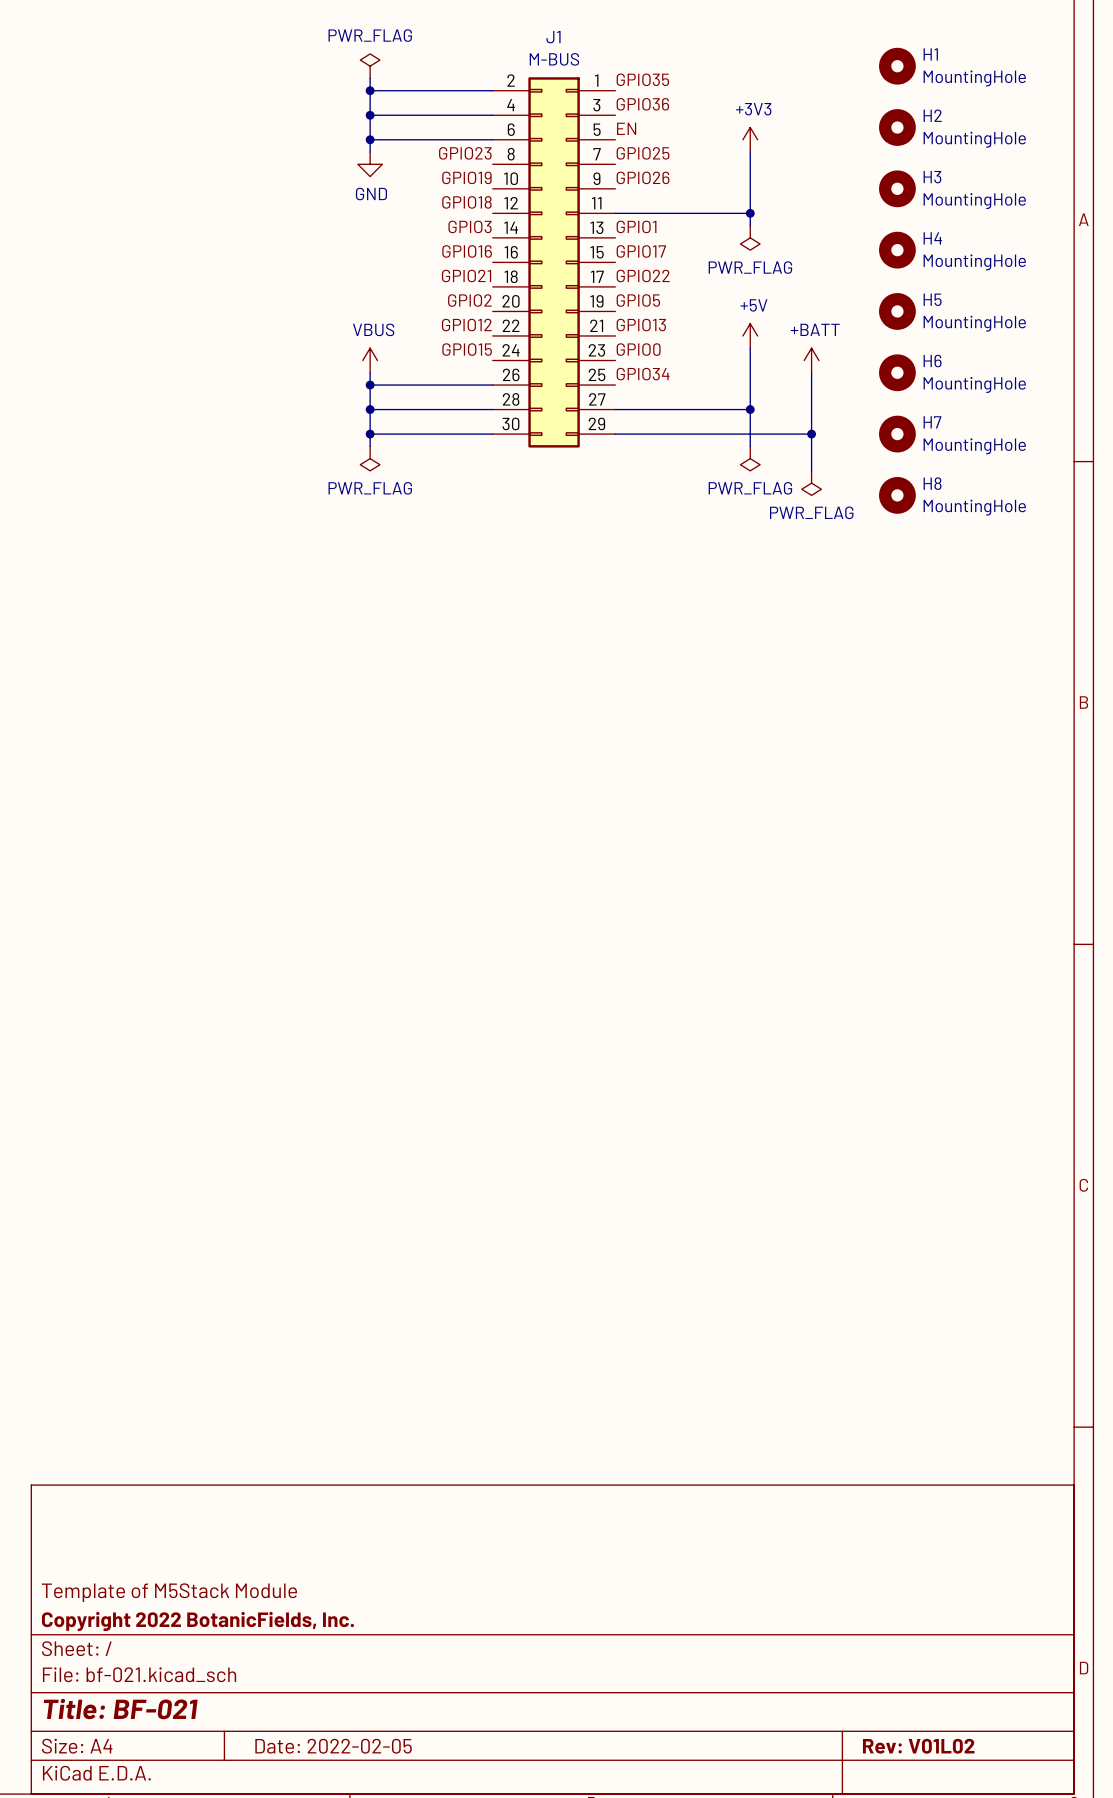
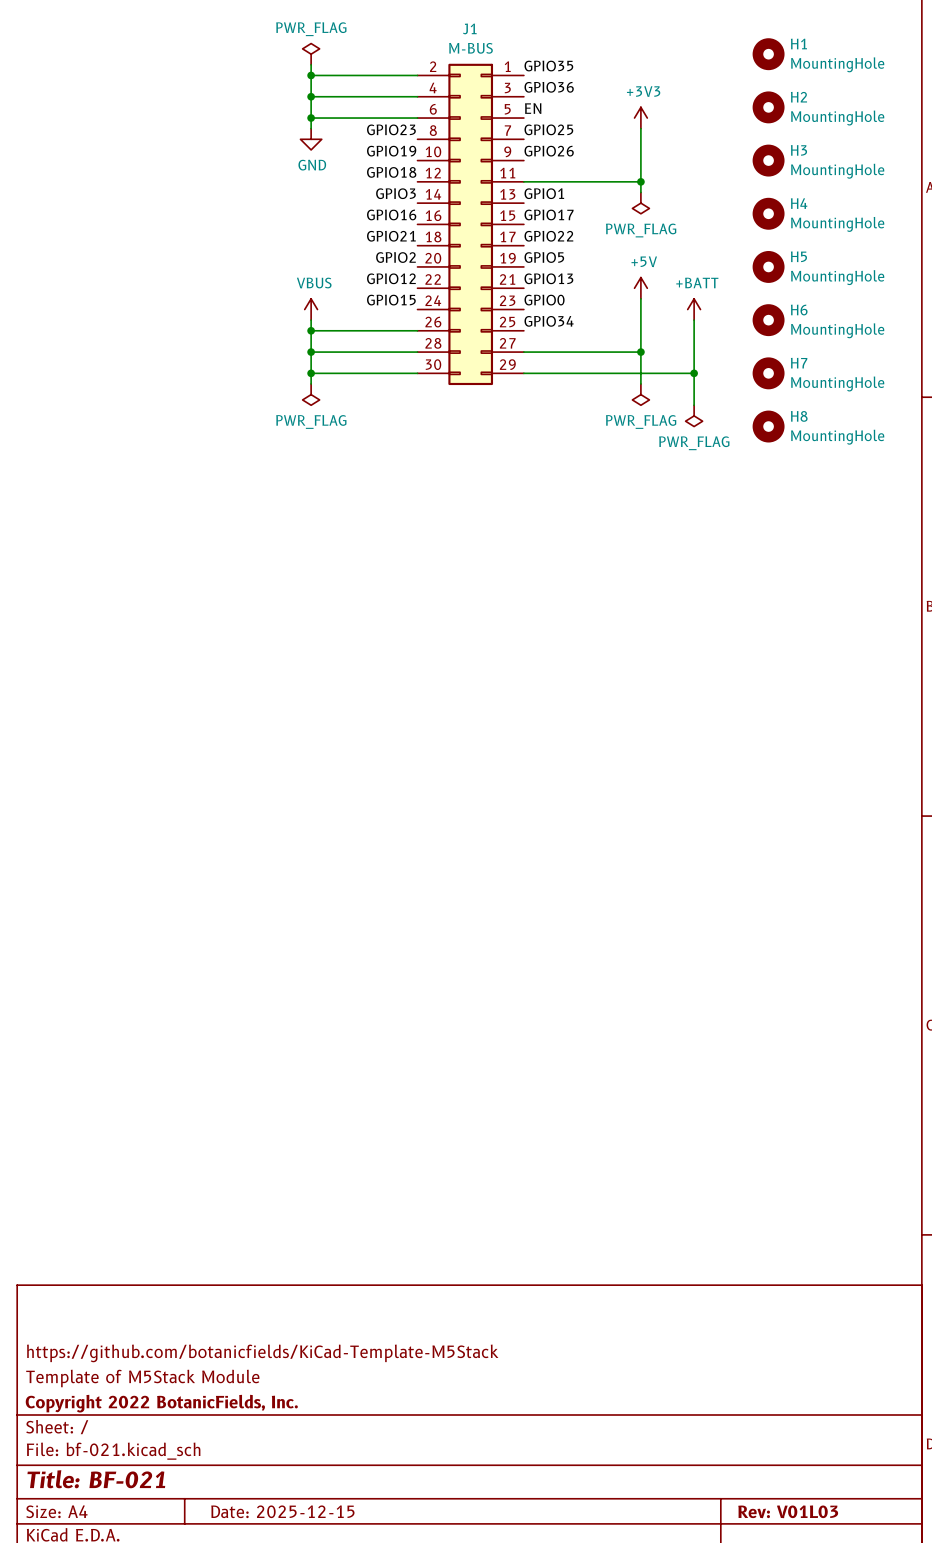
title block: none -> https://github.com/botanicfields/KiCad-Template-M5Stack (262, 1353)
title block: Date: 2022-02-05 (333, 1746) -> Date: 2025-12-15 (282, 1511)
title block: Rev: V01L02 (918, 1746) -> Rev: V01L03 (788, 1511)

